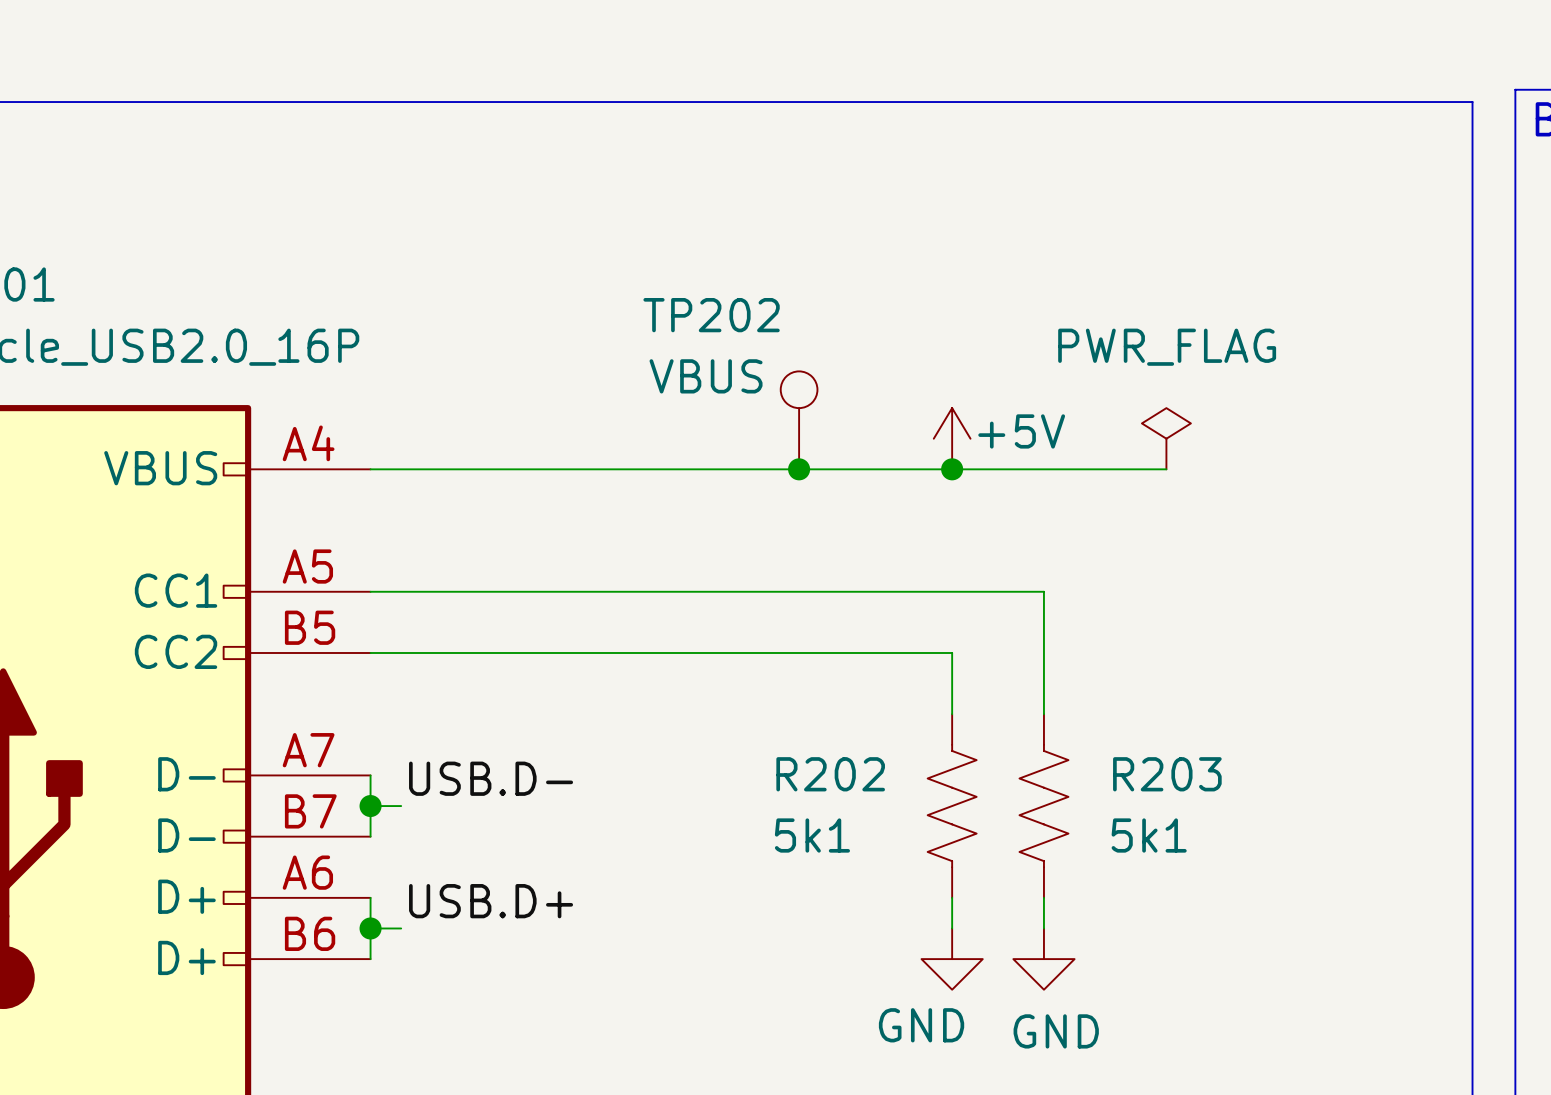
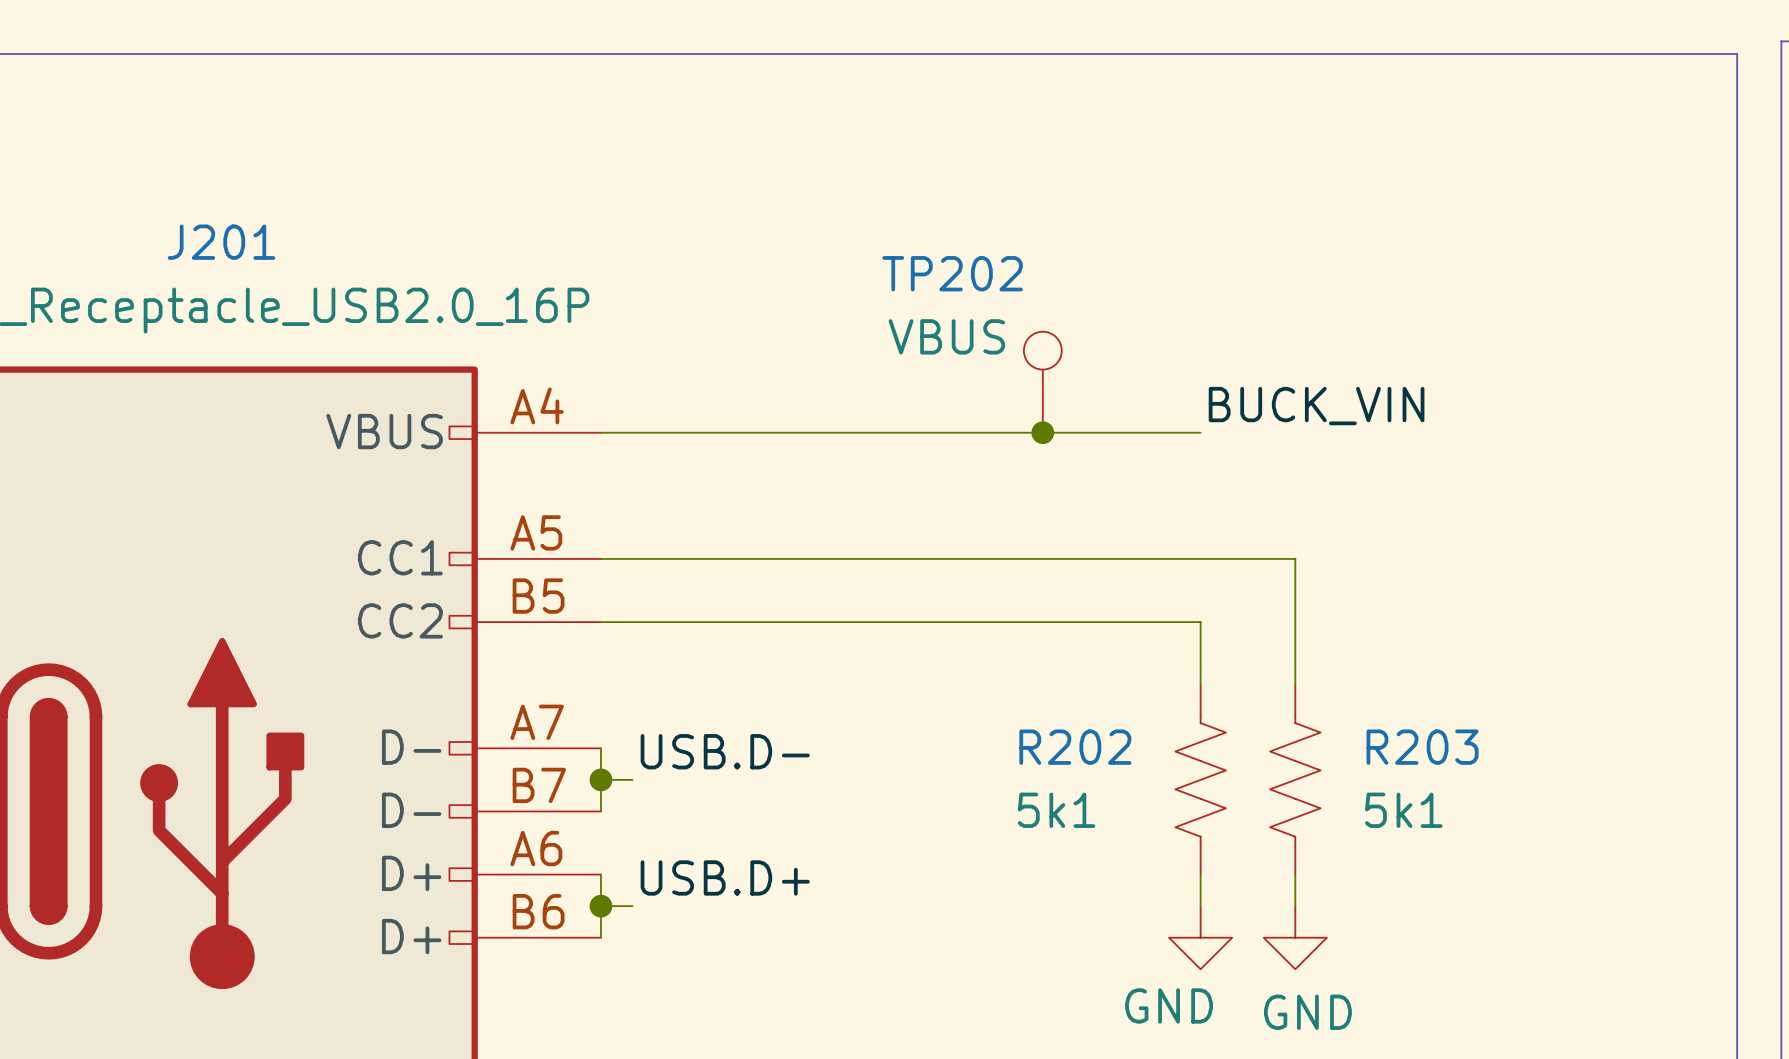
power symbol: +5V (952, 438) -> none
power symbol: PWR_FLAG (1166, 438) -> none
label: none -> BUCK_VIN (1316, 406)
wire: (952, 469) (1166, 469) -> none
junction: (952, 469) -> none

